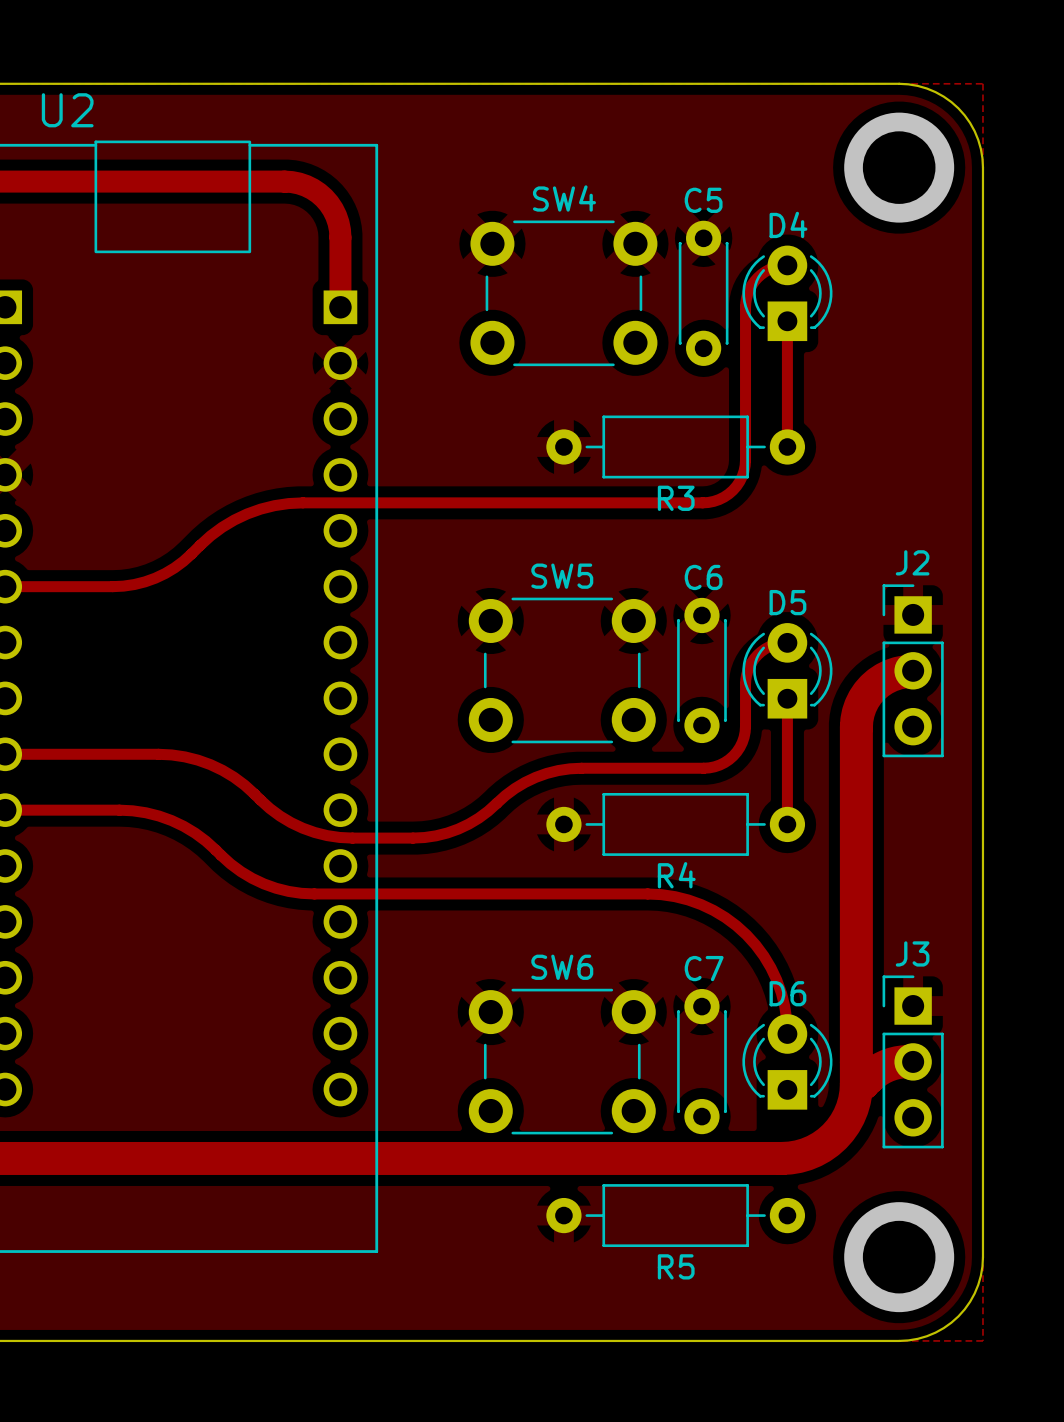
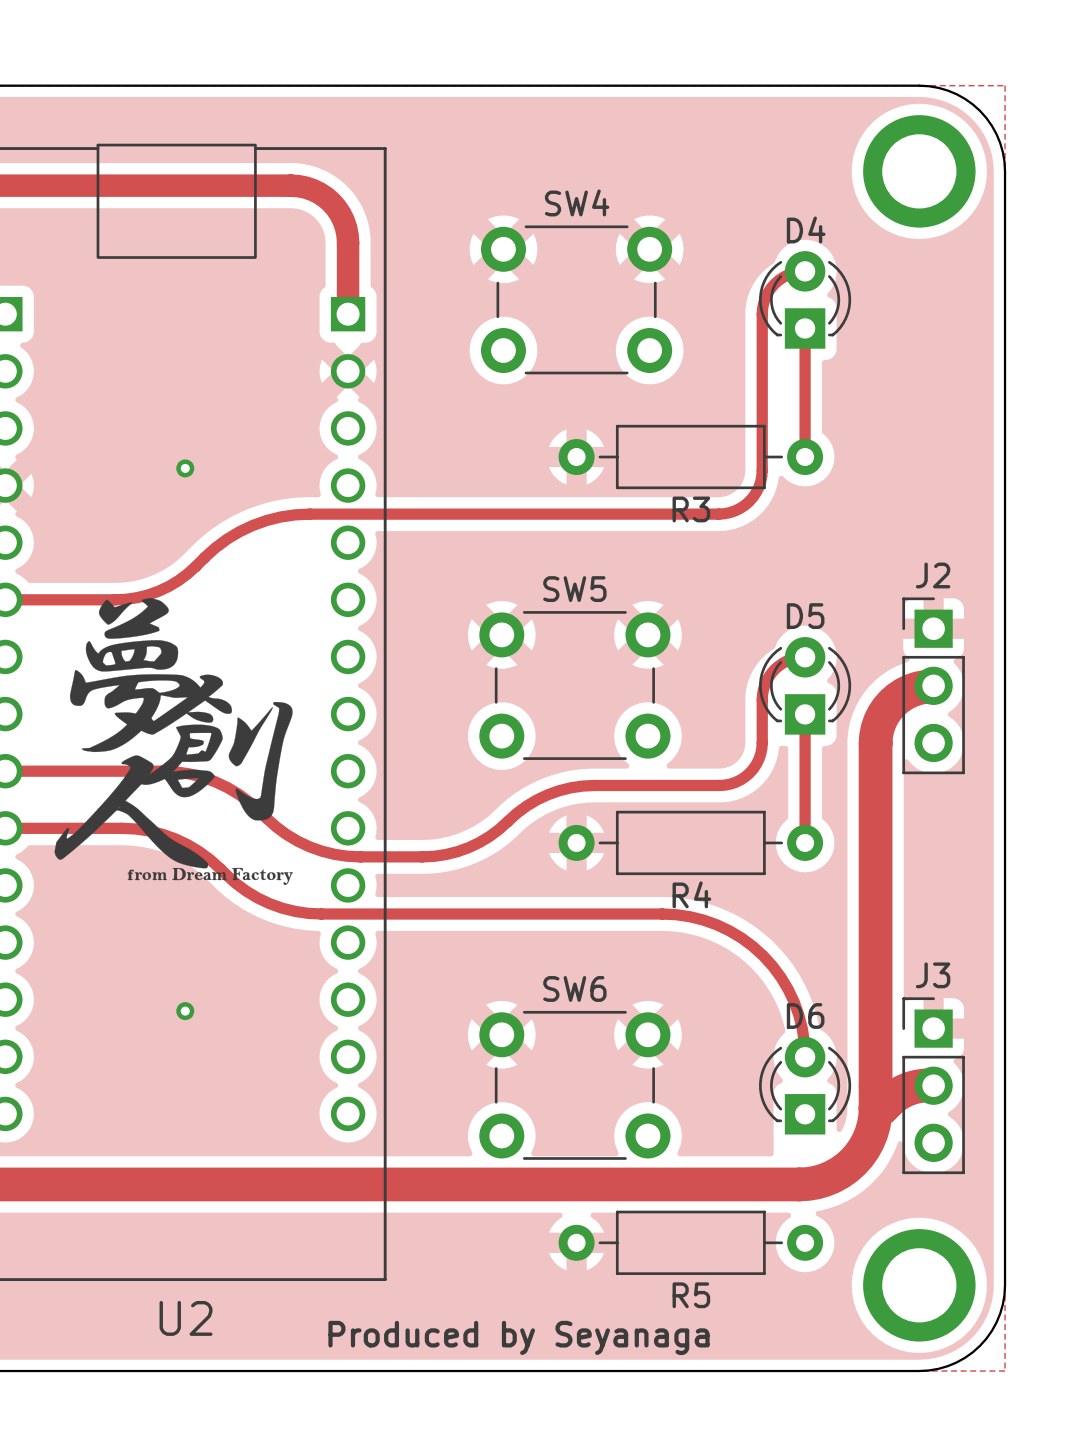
U2 name position: U2 (67, 110) -> U2 (186, 1318)
C5: (703, 293) -> none
via: none -> (185, 468)
drawing: none -> [54, 597, 293, 885]
C6: (701, 670) -> none
via: none -> (185, 1011)
C7: (701, 1061) -> none
text: none -> Produced by Seyanaga (518, 1337)

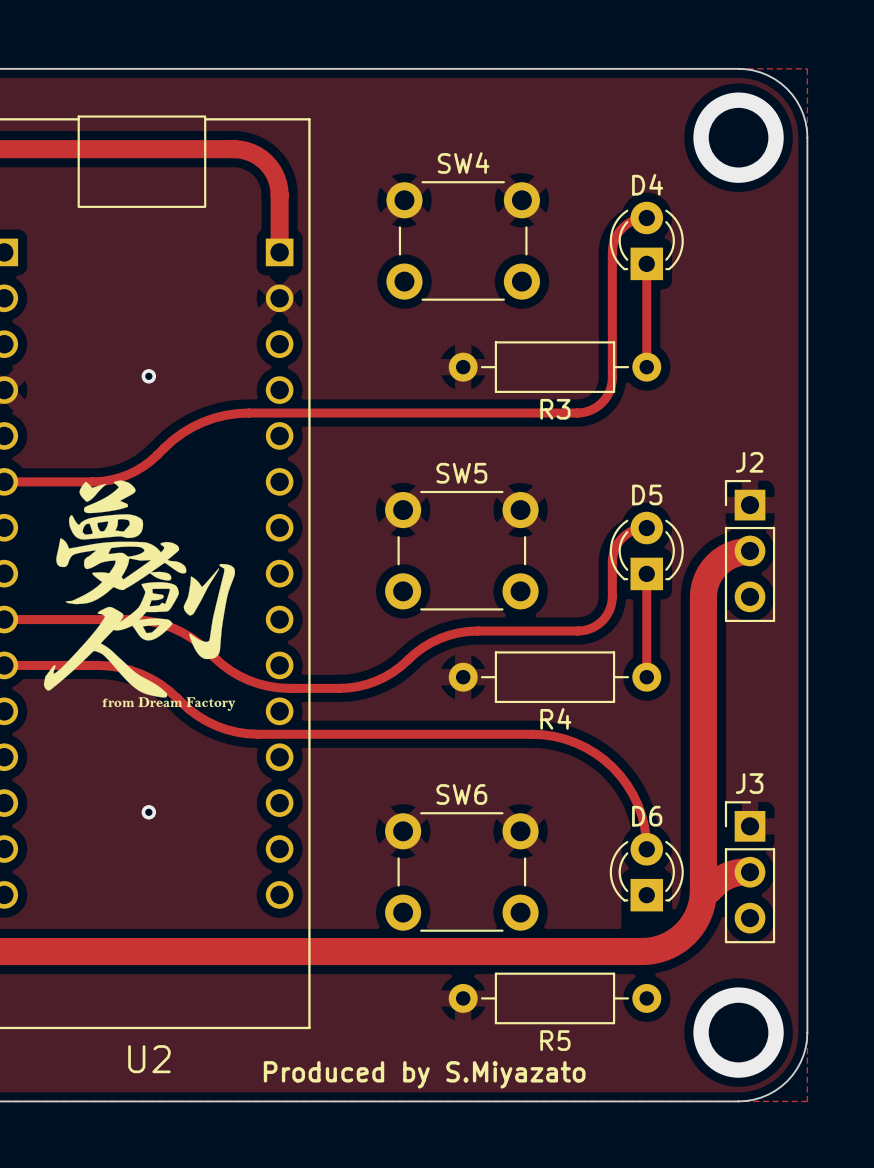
text: Produced by Seyanaga (518, 1337) -> Produced by S.Miyazato (424, 1074)

